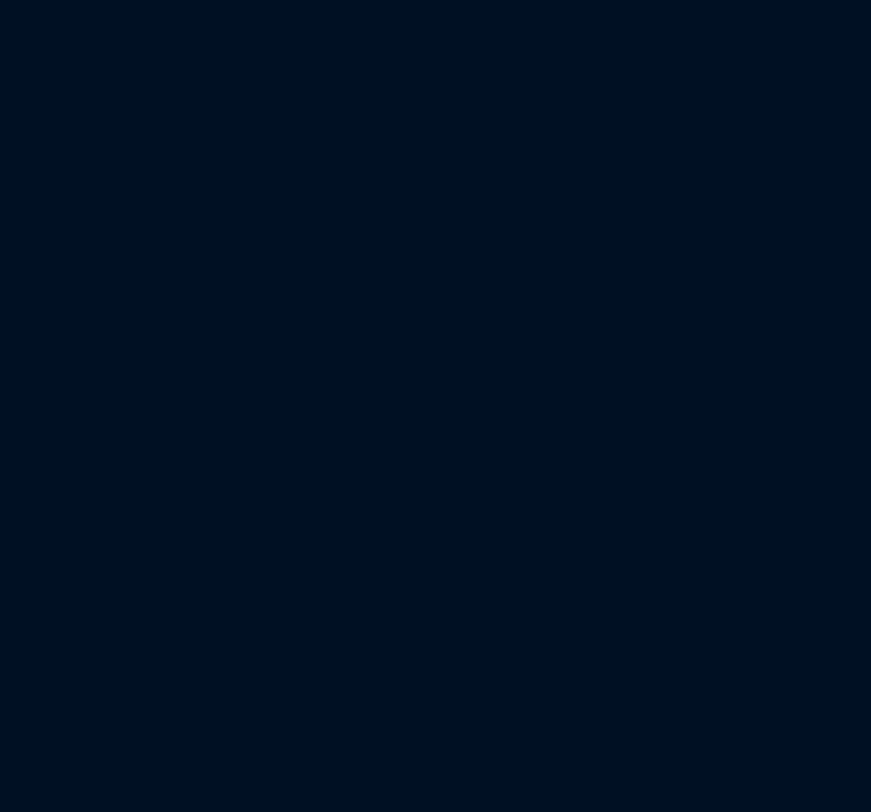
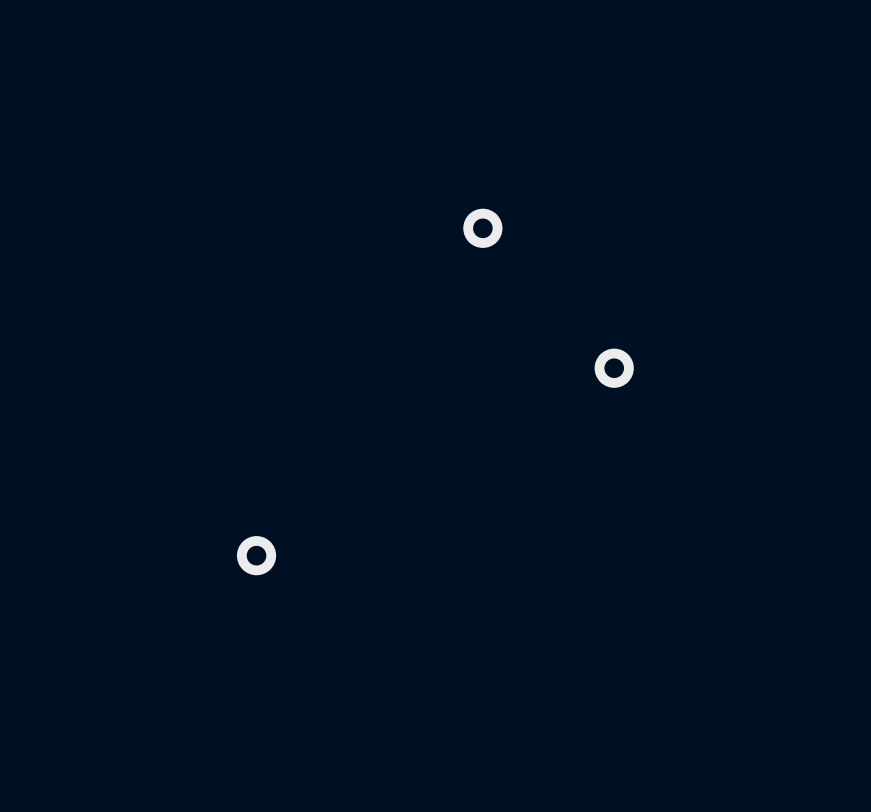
via: none -> (482, 228)
via: none -> (614, 368)
via: none -> (256, 555)

